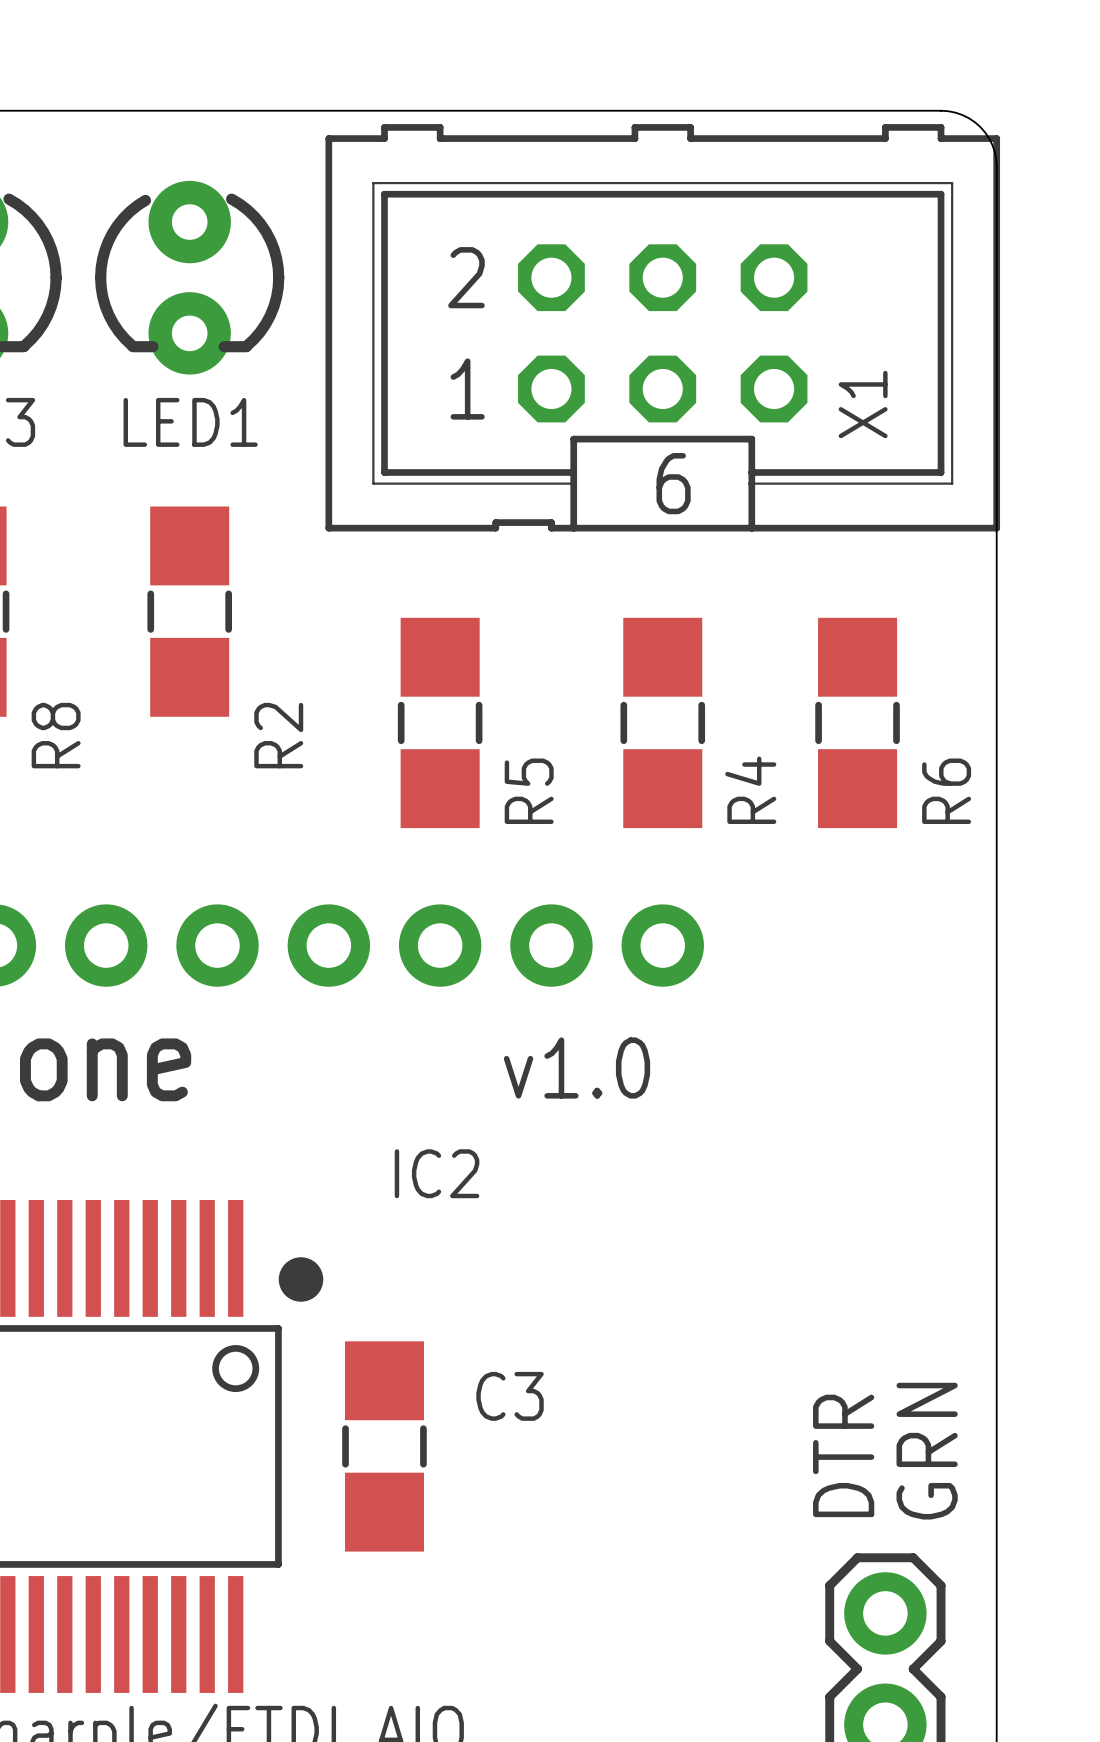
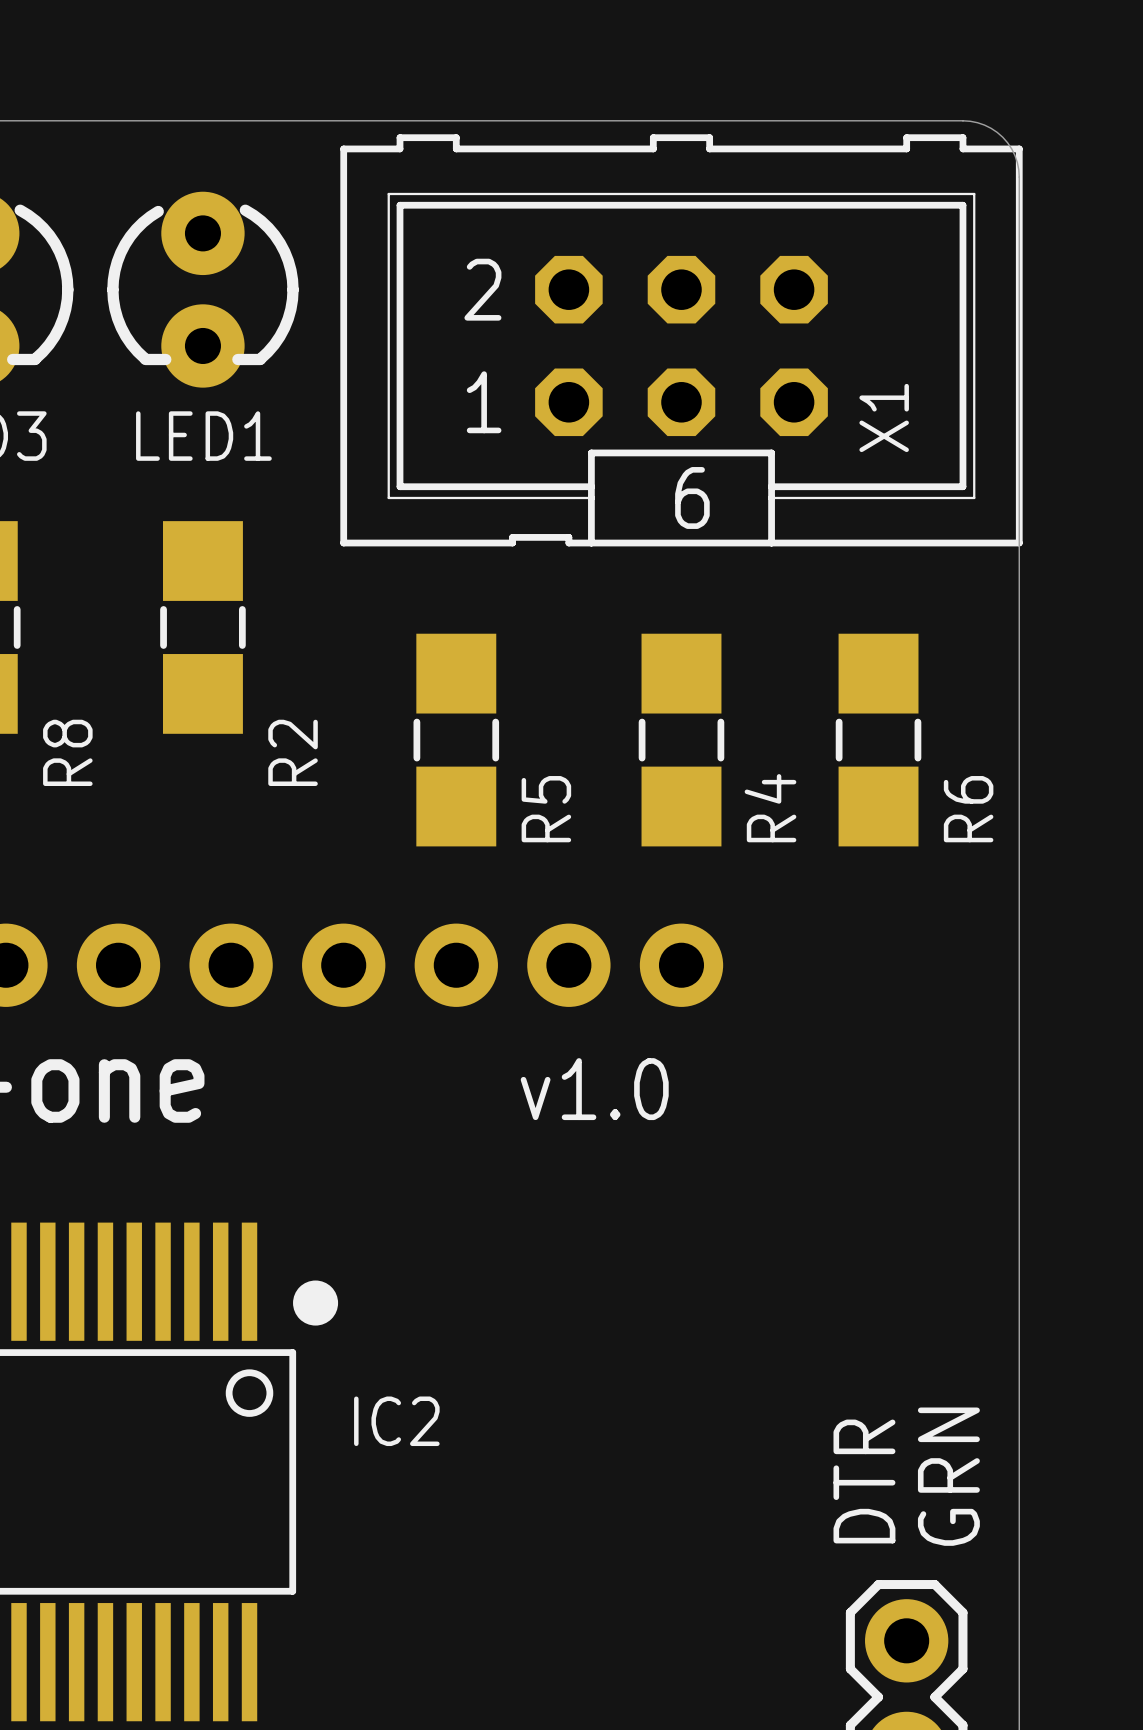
IC2 name position: IC2 (437, 1173) -> IC2 (396, 1421)
C3: (384, 1446) -> none

